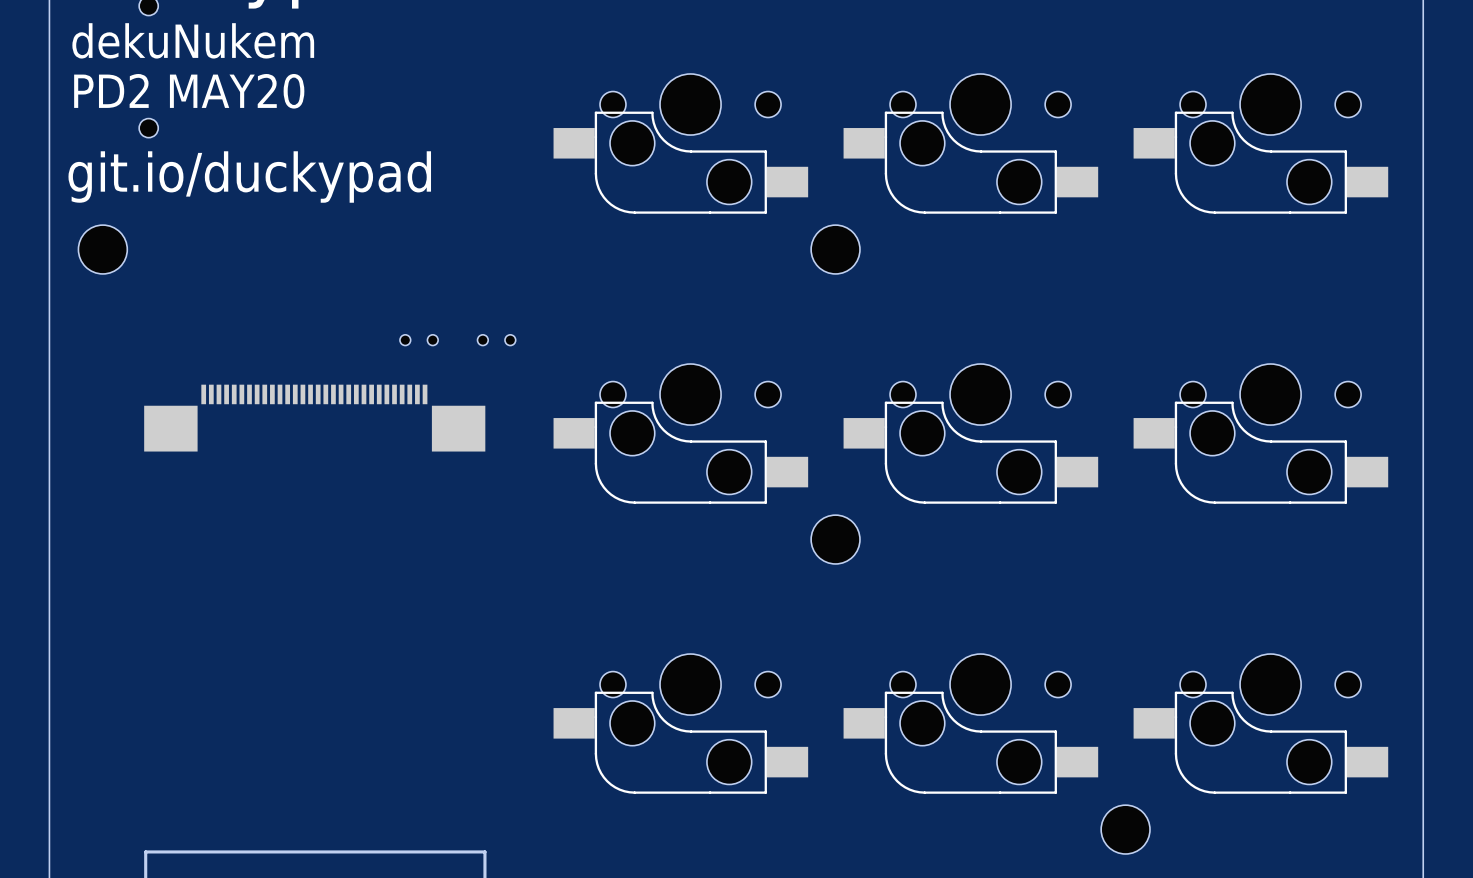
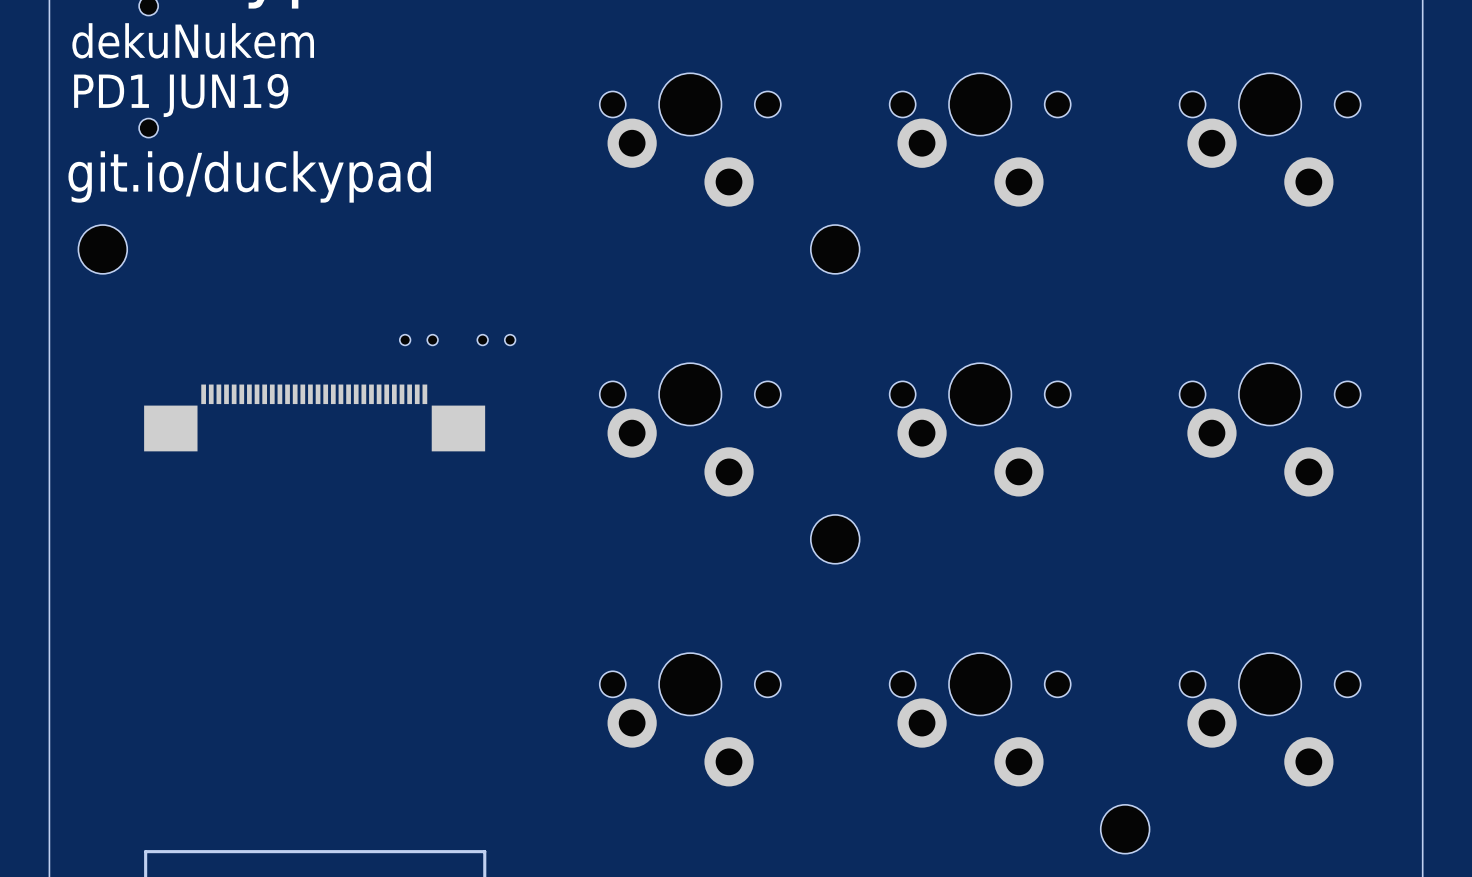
part footprint: [553, 73, 809, 214] -> [599, 73, 781, 207]
part footprint: [843, 73, 1099, 214] -> [889, 73, 1071, 207]
part footprint: [1133, 73, 1389, 214] -> [1179, 73, 1361, 207]
text: PD2 MAY20 (189, 91) -> PD1 JUN19 (181, 95)
part footprint: [553, 364, 809, 504] -> [599, 363, 781, 497]
part footprint: [843, 364, 1099, 504] -> [889, 363, 1071, 497]
part footprint: [1133, 364, 1389, 504] -> [1179, 363, 1361, 497]
part footprint: [553, 654, 809, 794] -> [599, 653, 781, 787]
part footprint: [843, 654, 1099, 794] -> [889, 653, 1071, 787]
part footprint: [1133, 654, 1389, 794] -> [1179, 653, 1361, 787]

